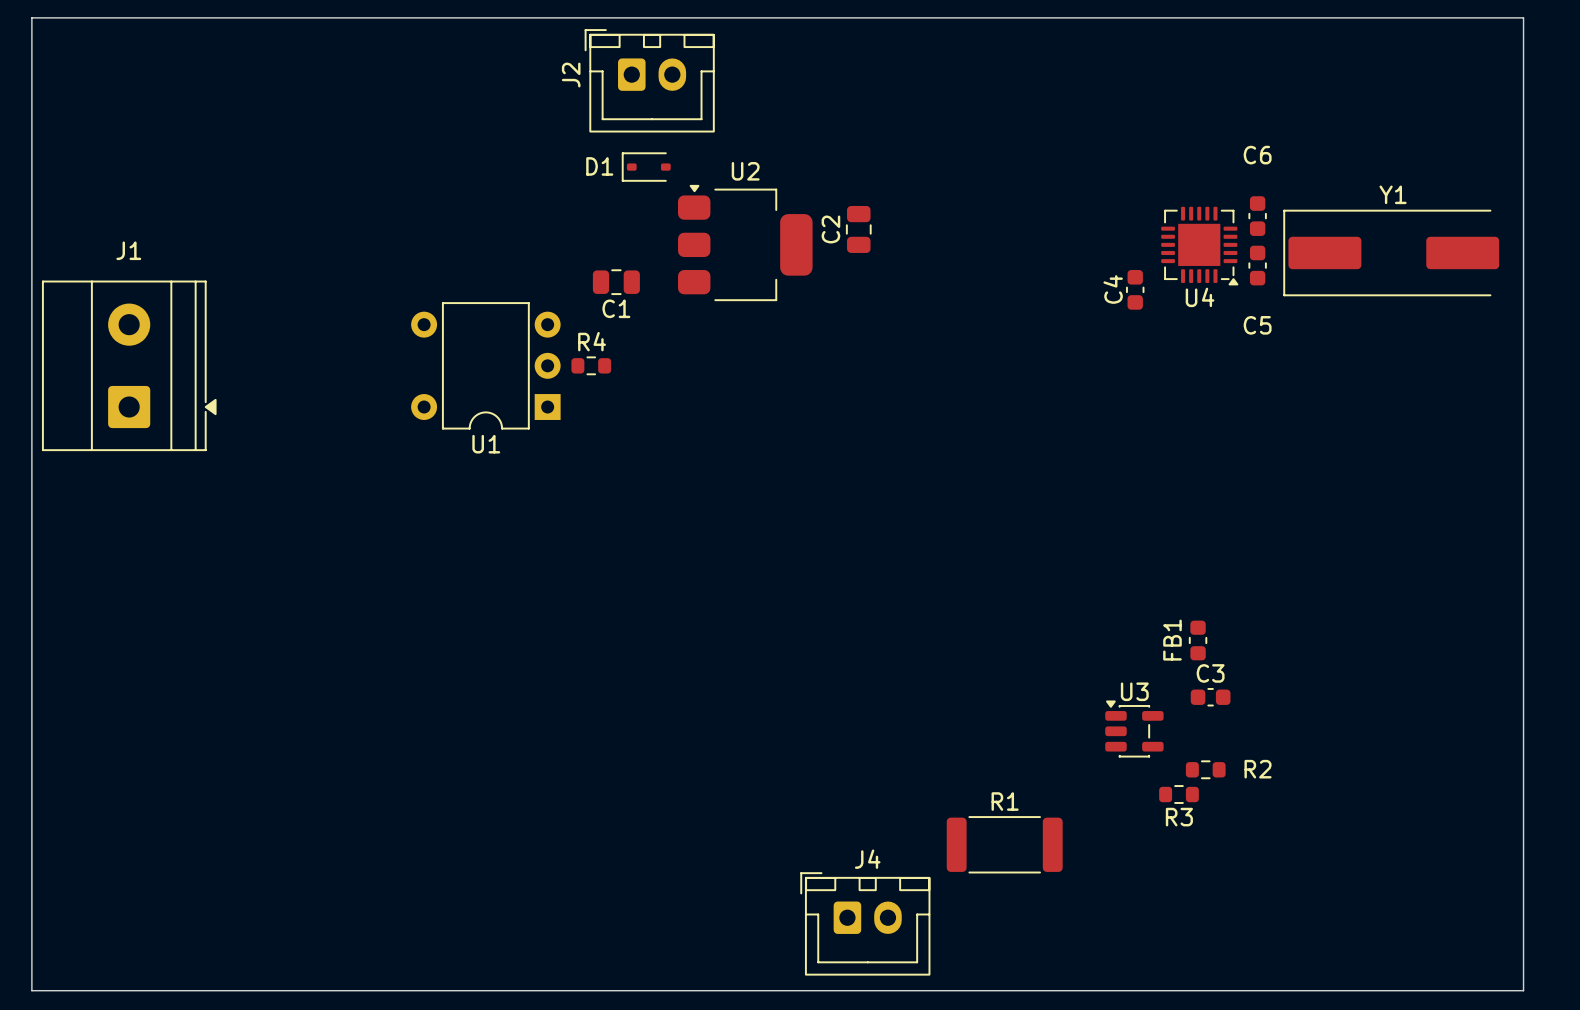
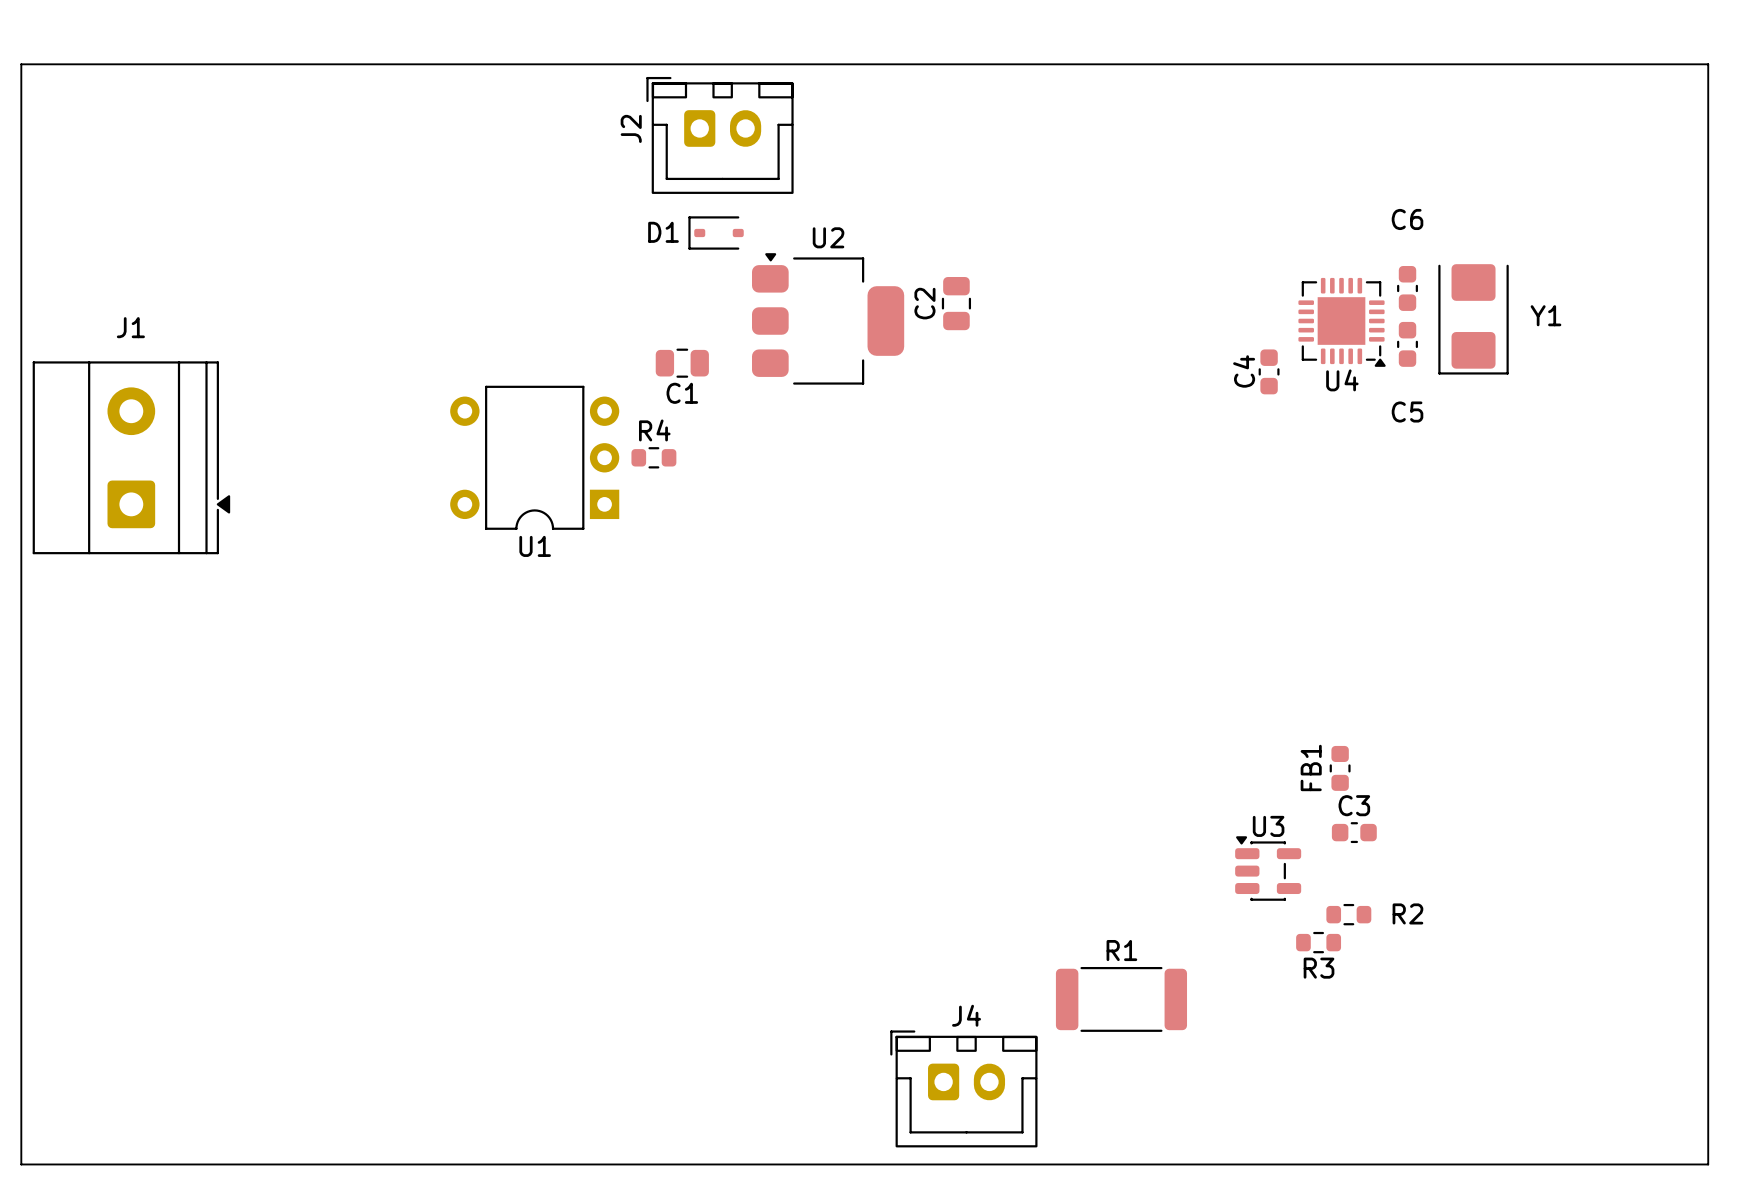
Y1 name position: Y1 (1393, 194) -> Y1 (1545, 315)
Y1 footprint: [1283, 209, 1500, 297] -> [1438, 264, 1509, 375]

